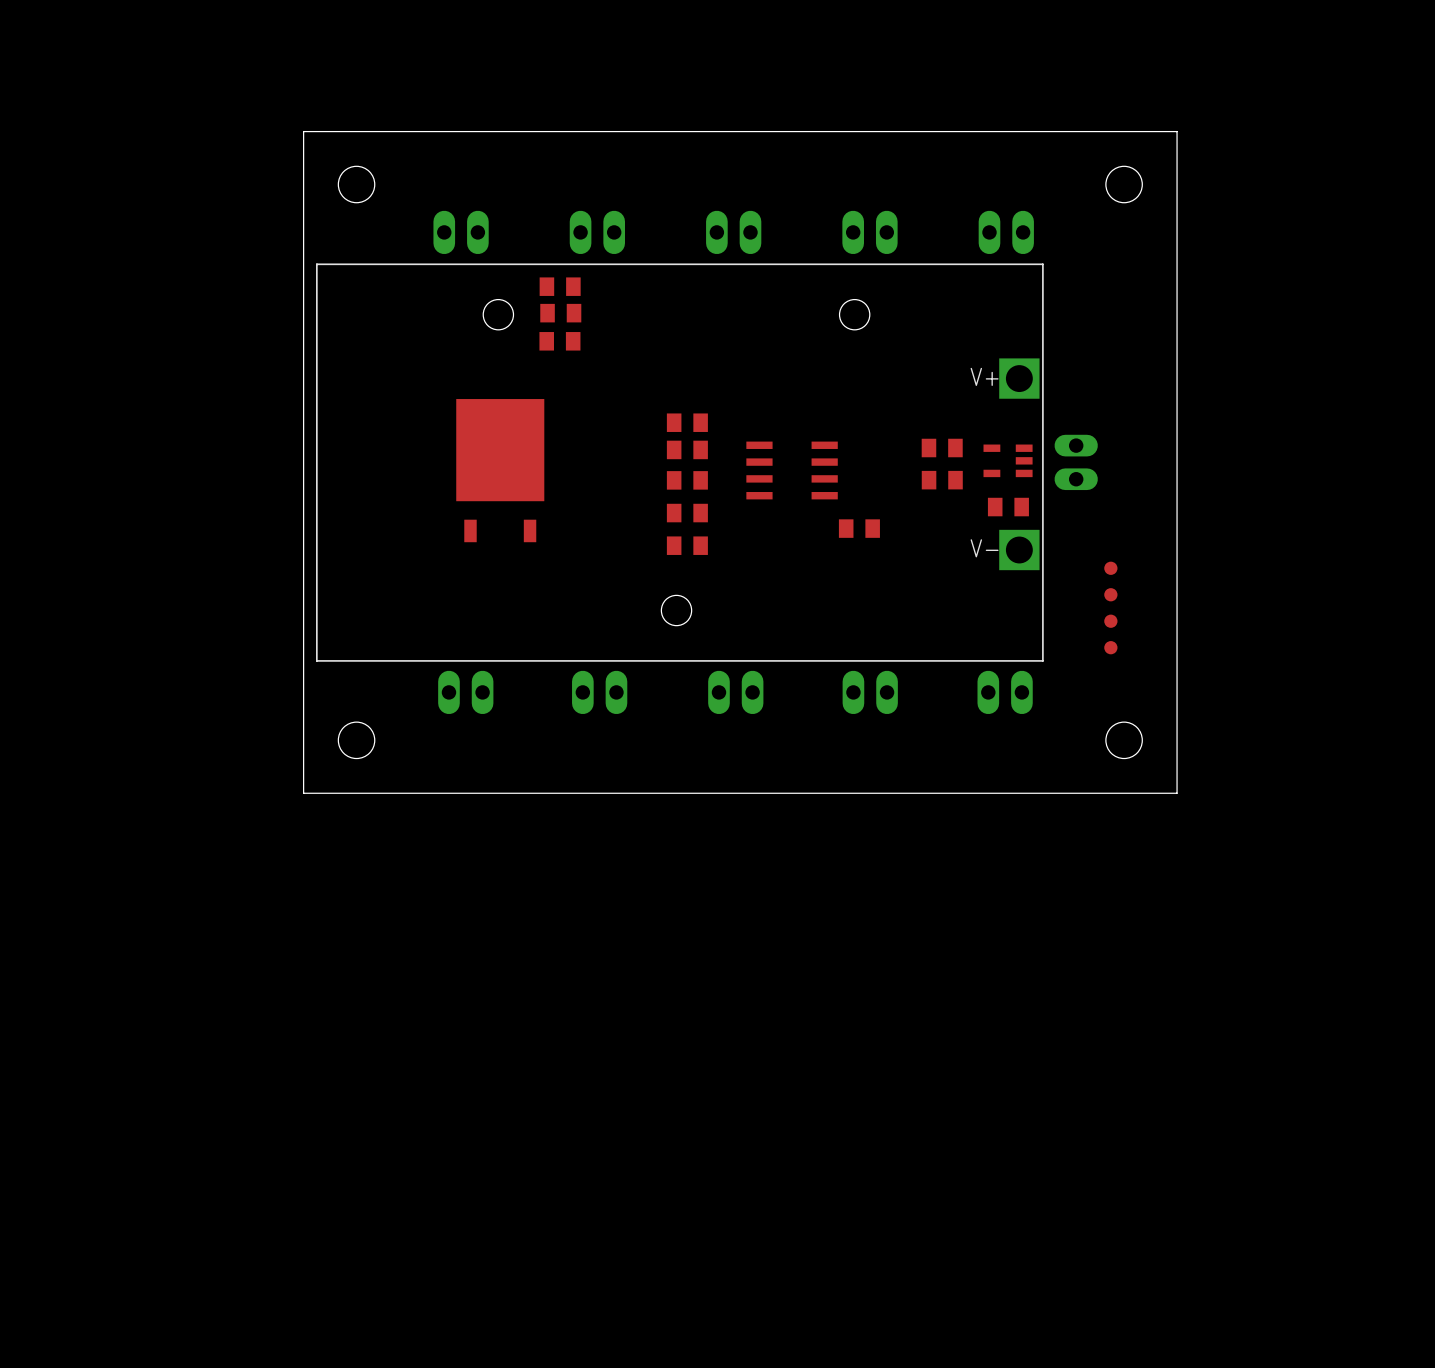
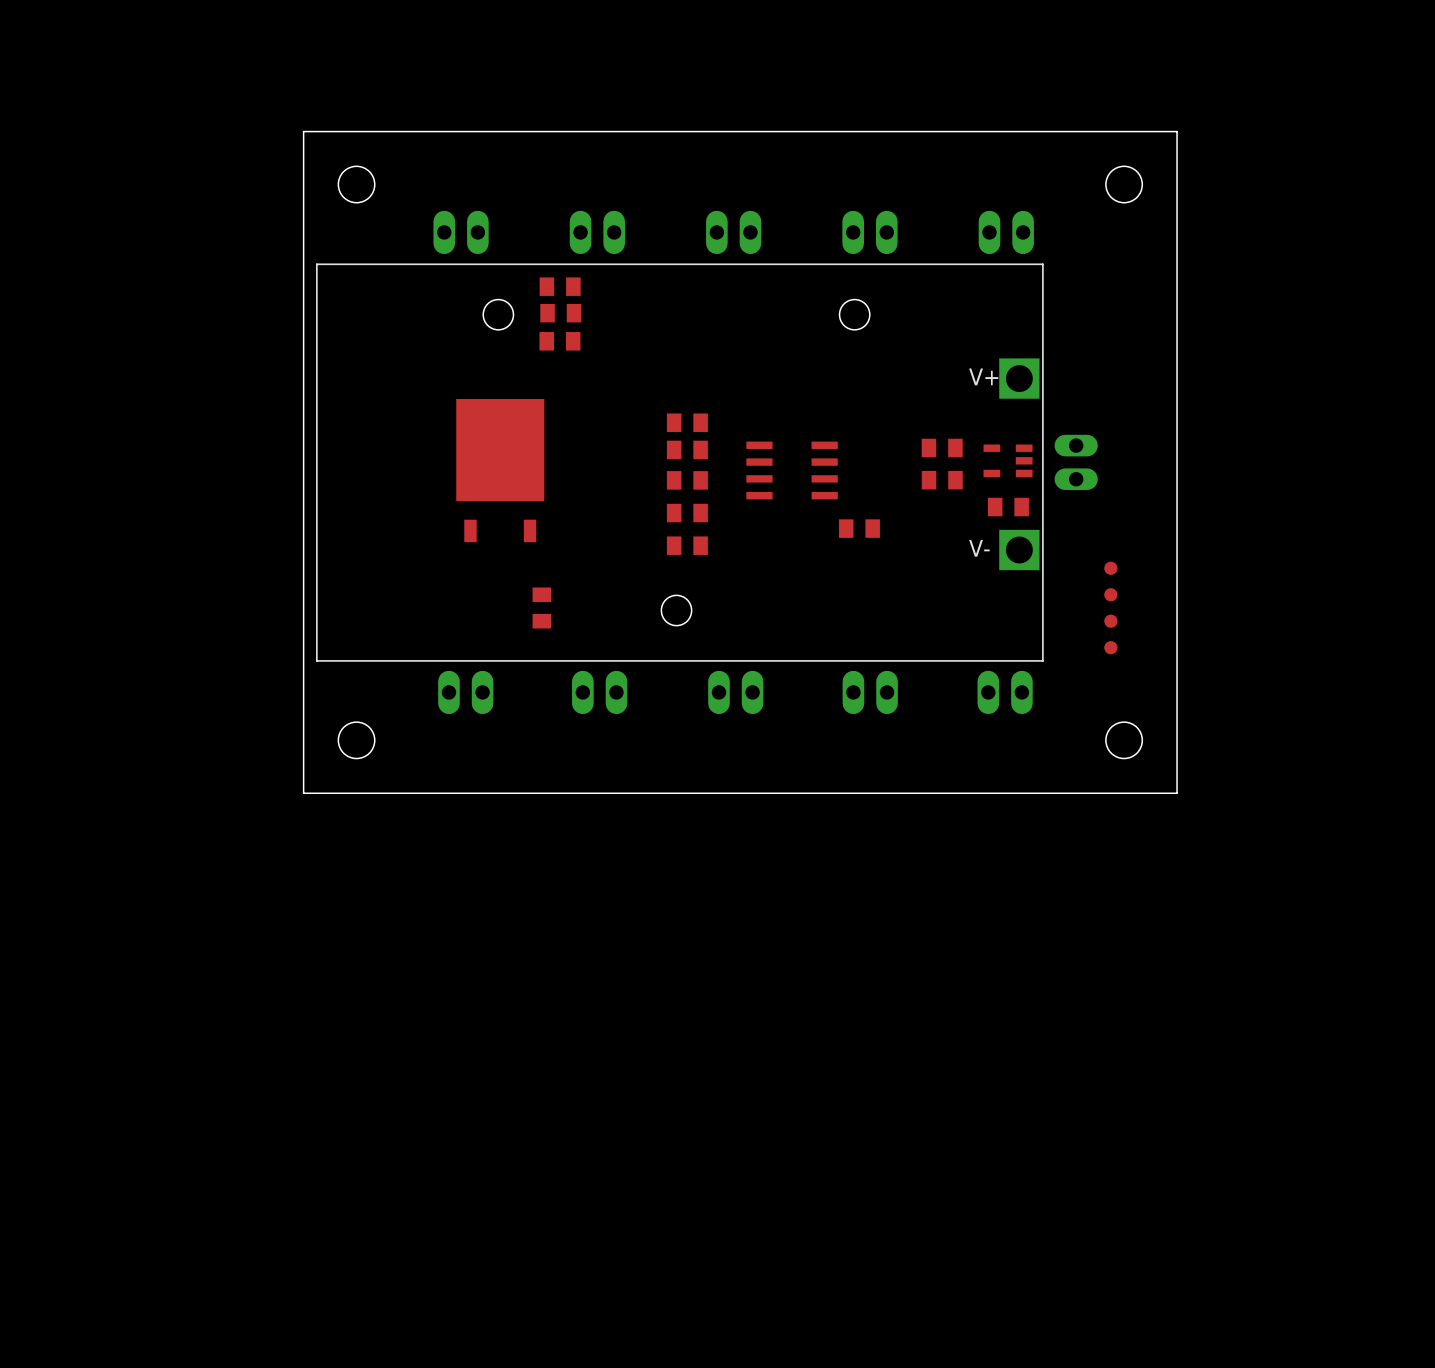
part: none -> (541, 607)

